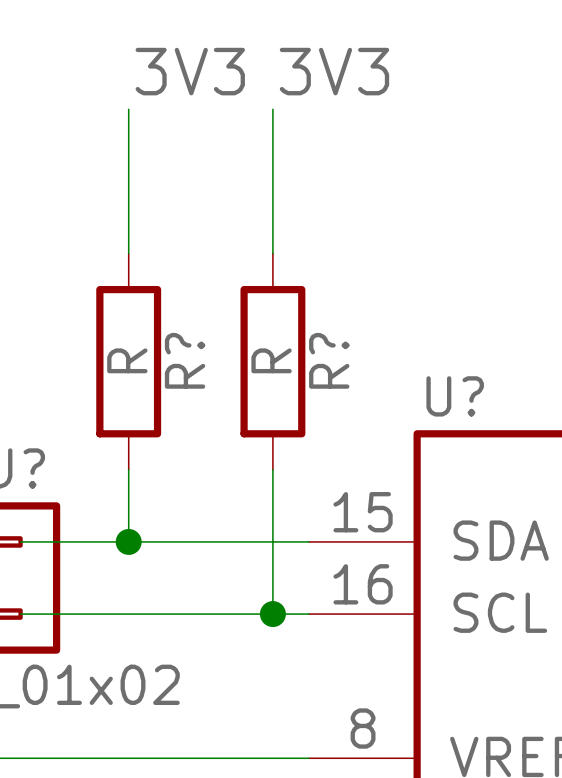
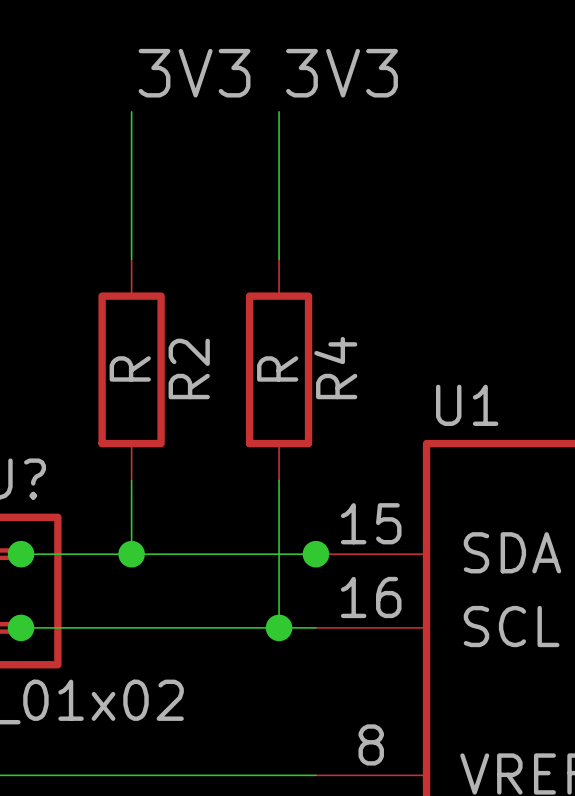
R? name: R? (185, 360) -> R2 (189, 368)
R? name: R? (329, 360) -> R4 (335, 368)
U? name: U? (455, 396) -> U1 (467, 405)
junction: none -> (21, 554)
junction: none -> (315, 554)
junction: none -> (21, 627)

